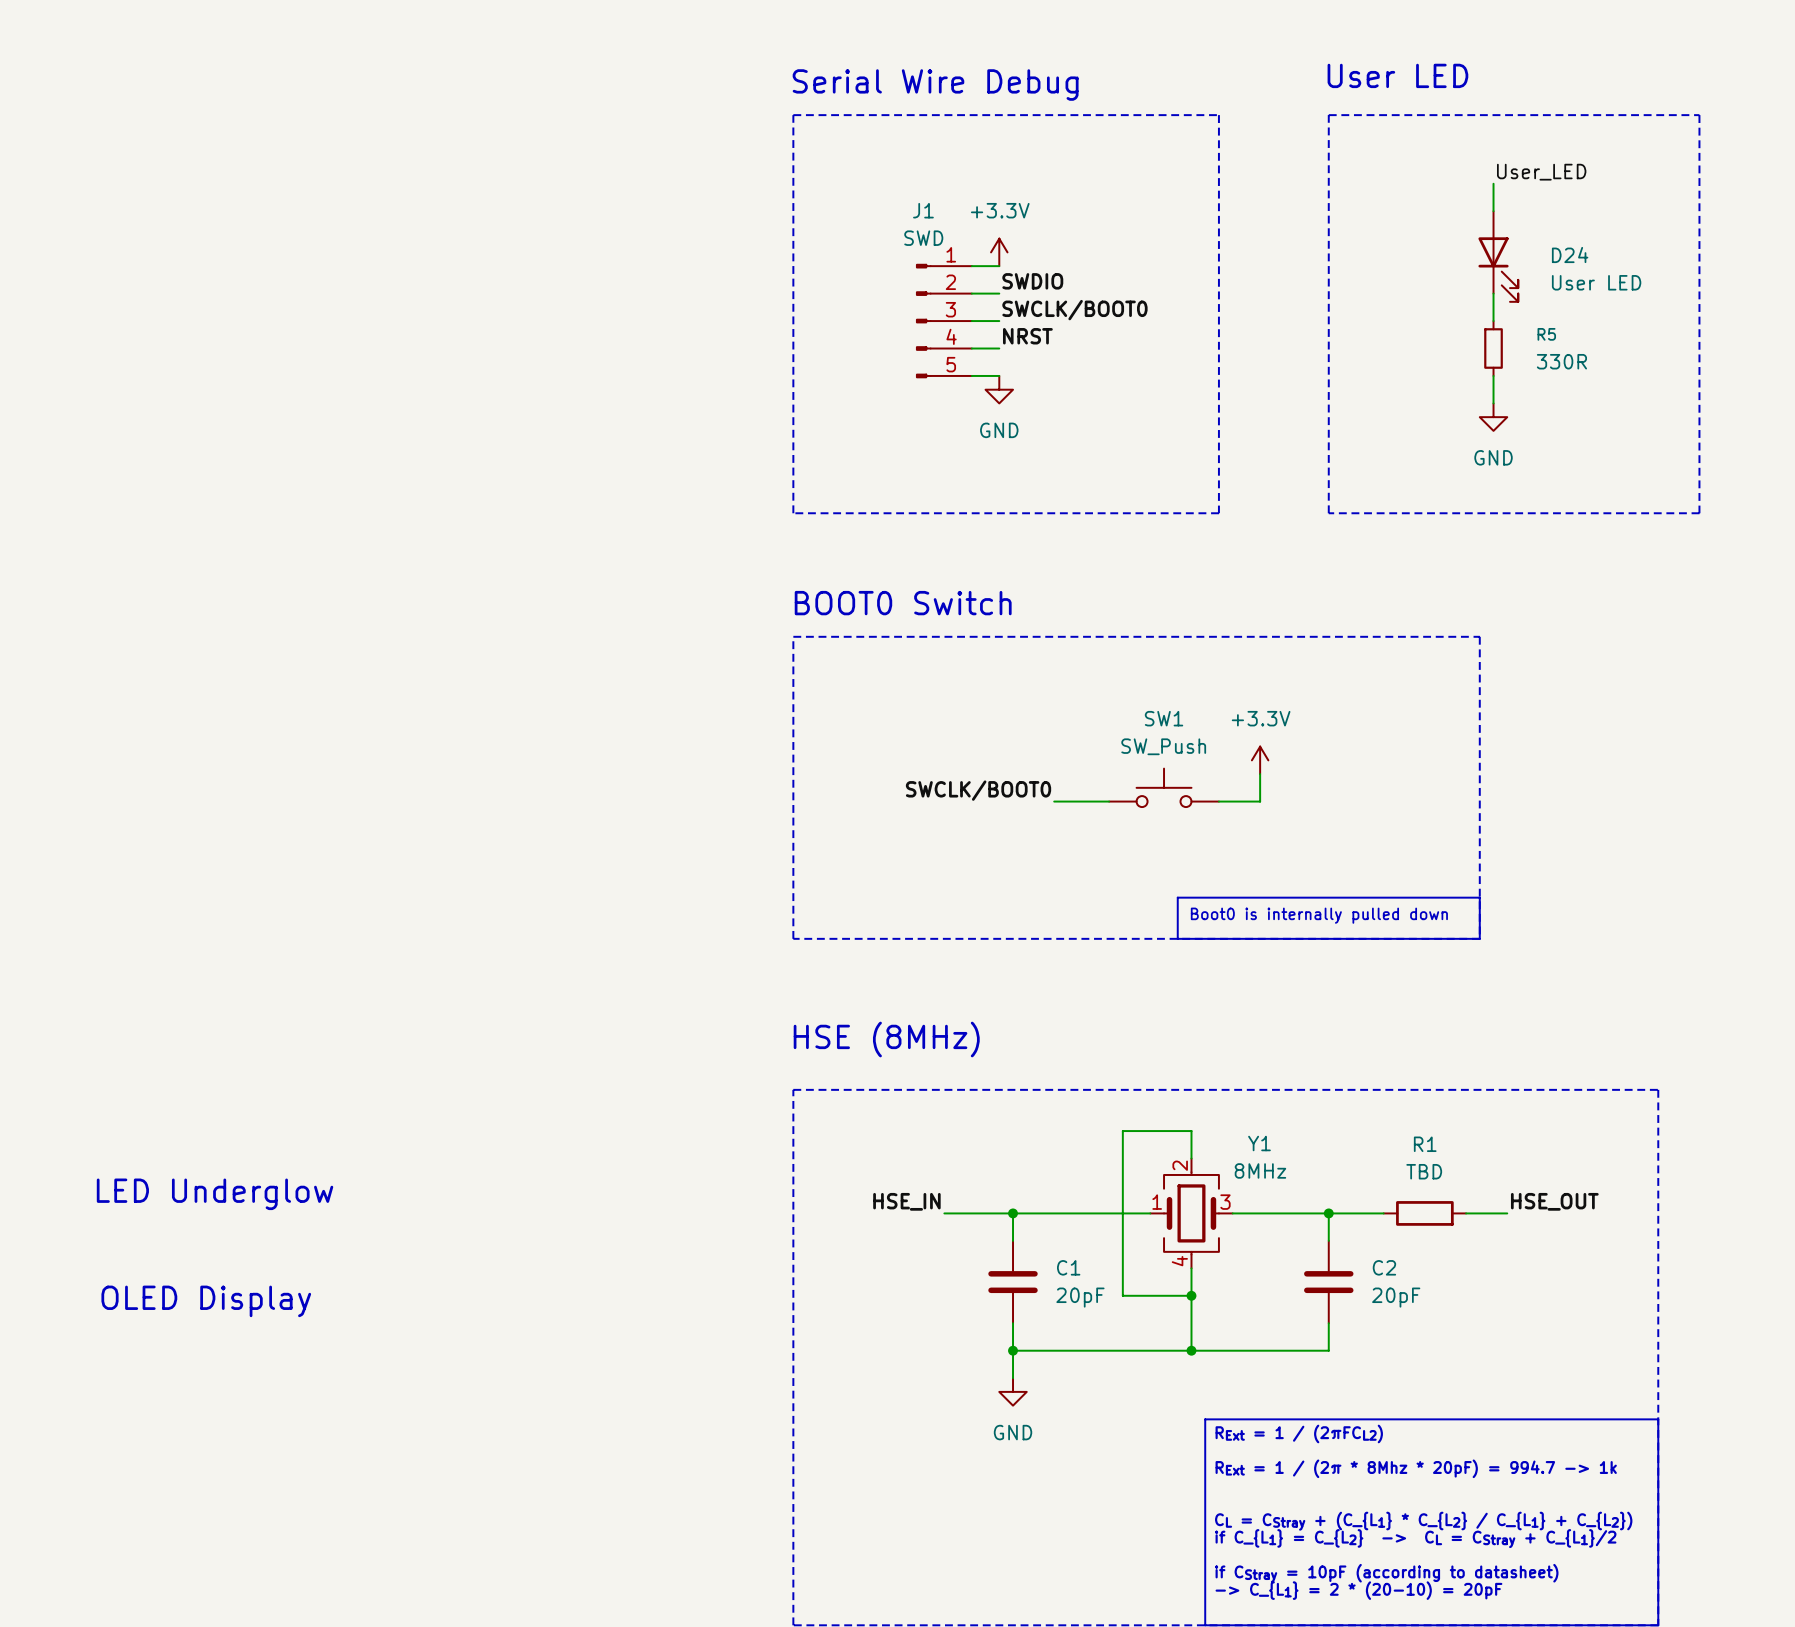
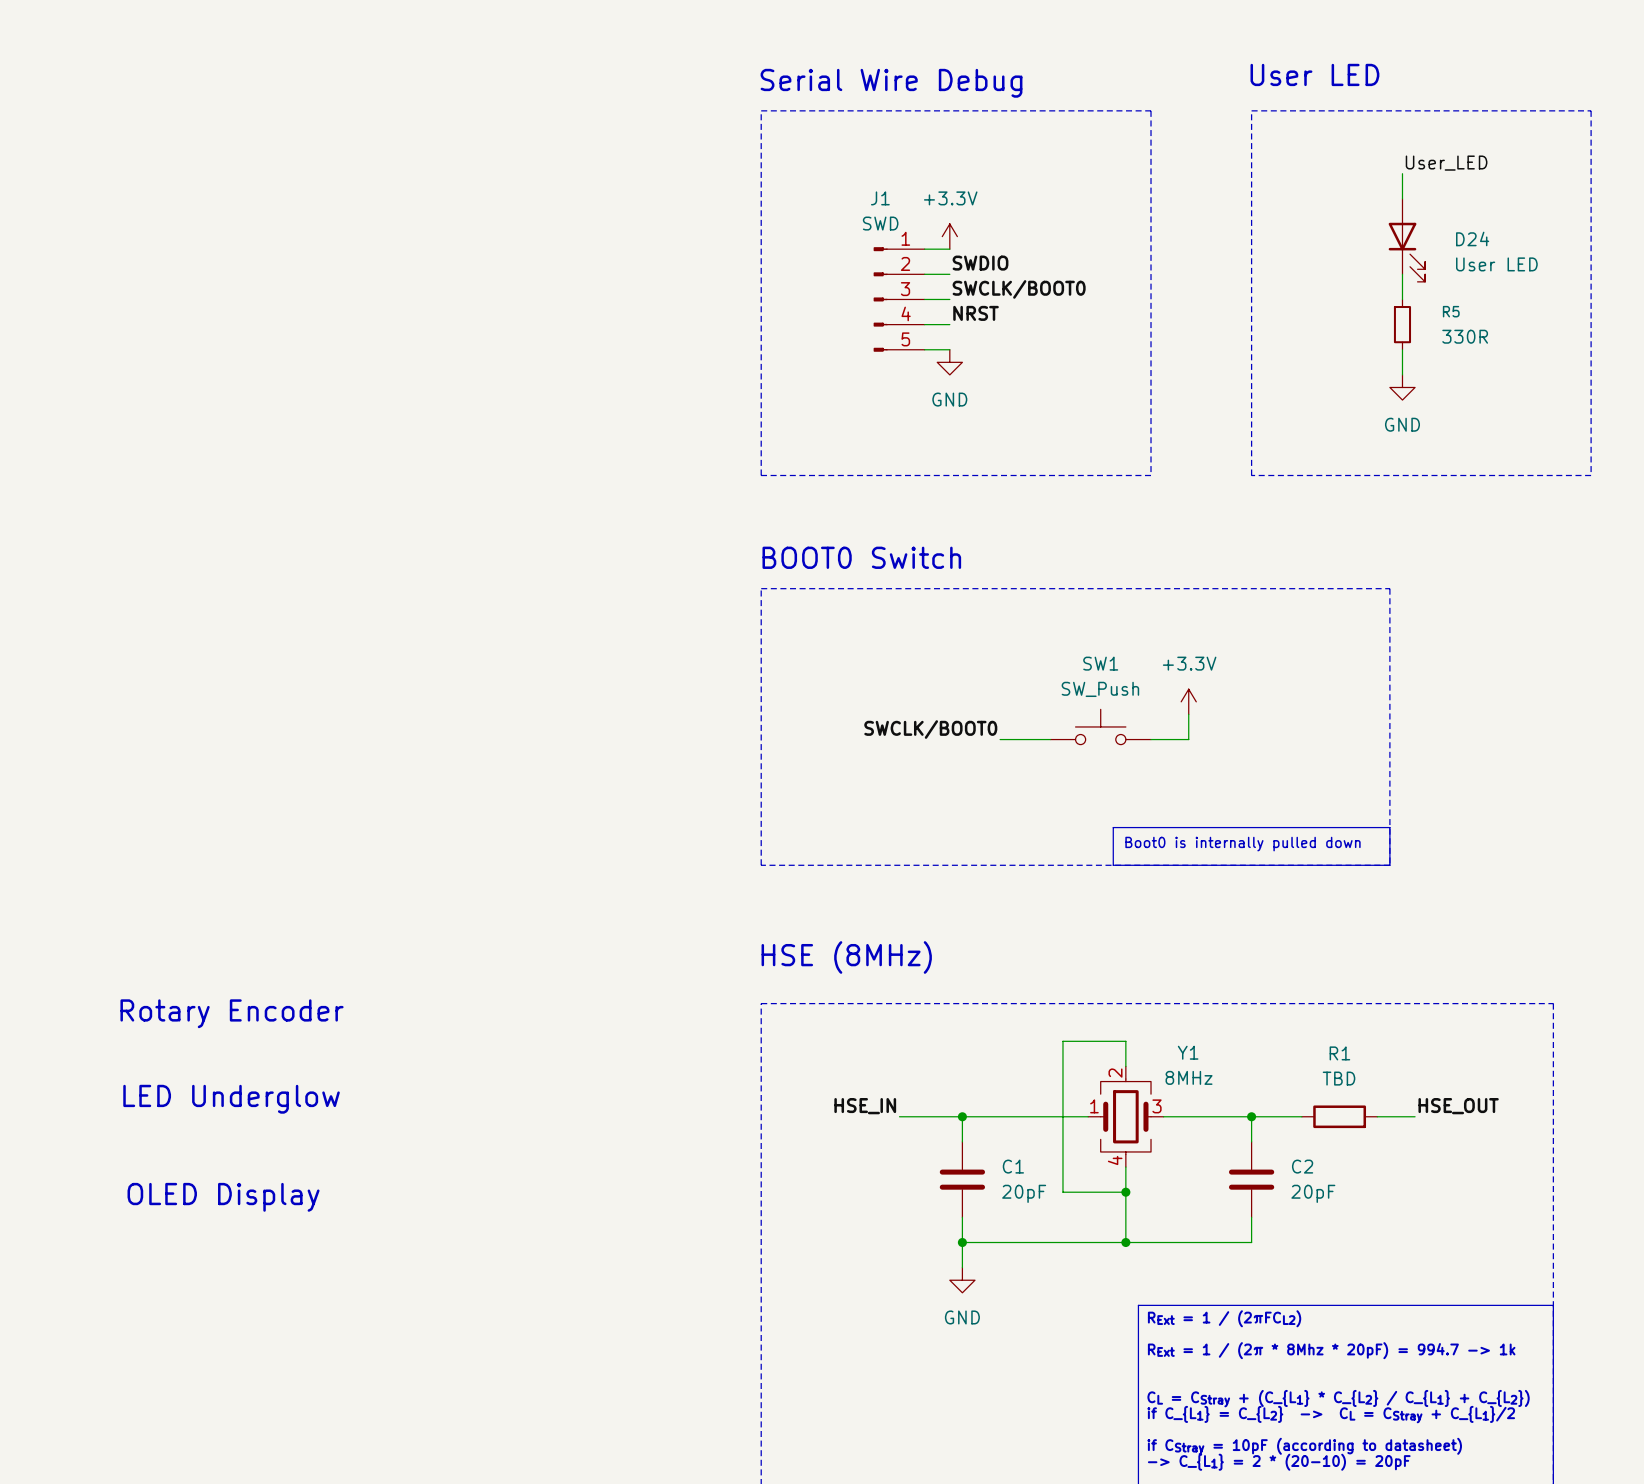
text: none -> Rotary Encoder (232, 1013)

